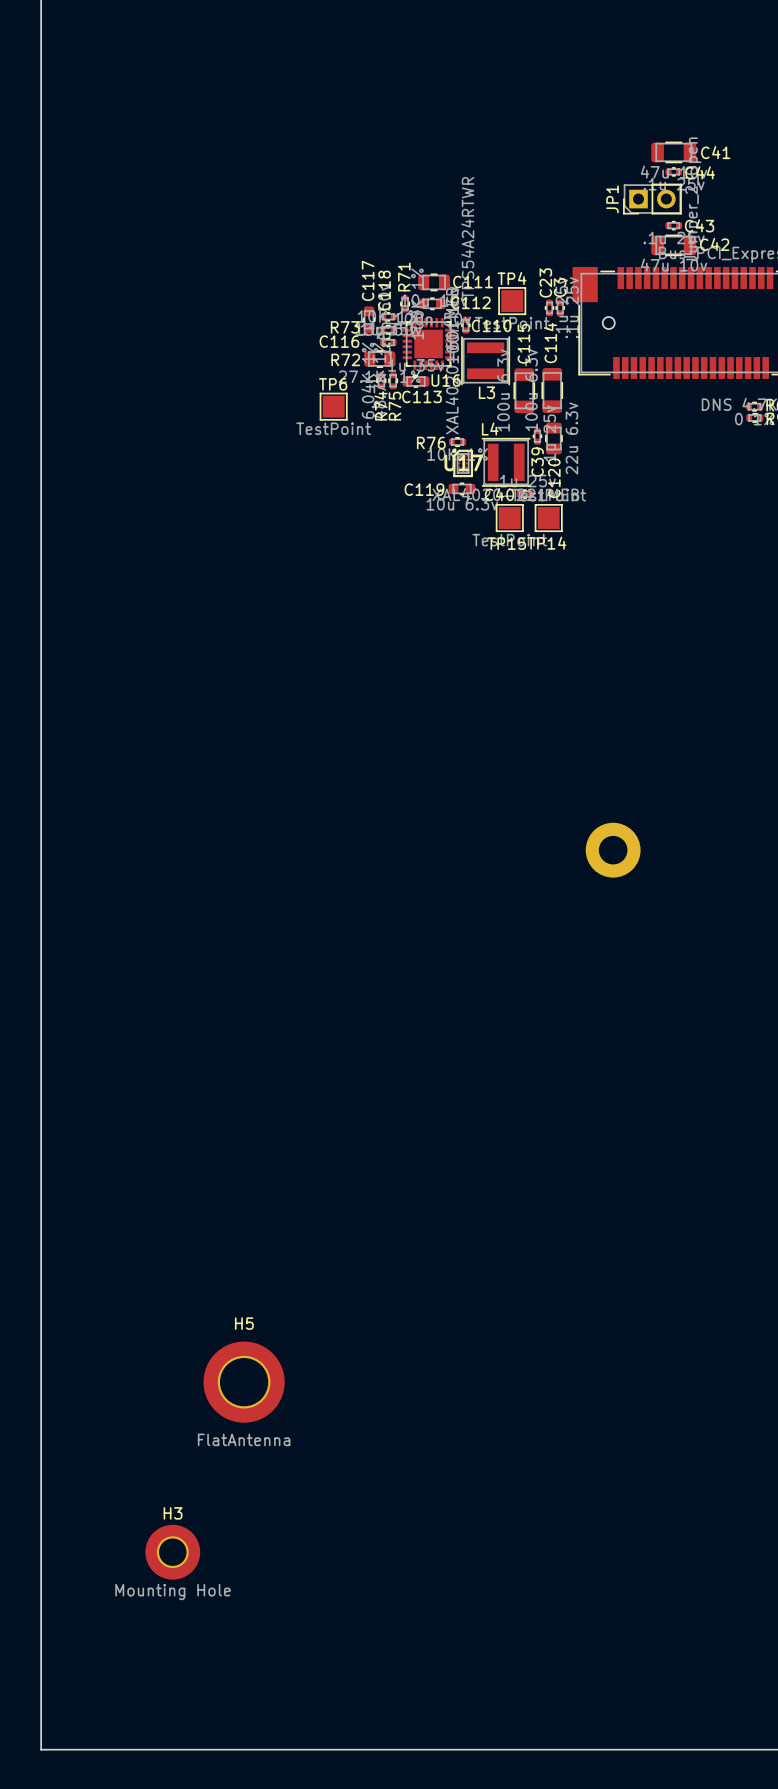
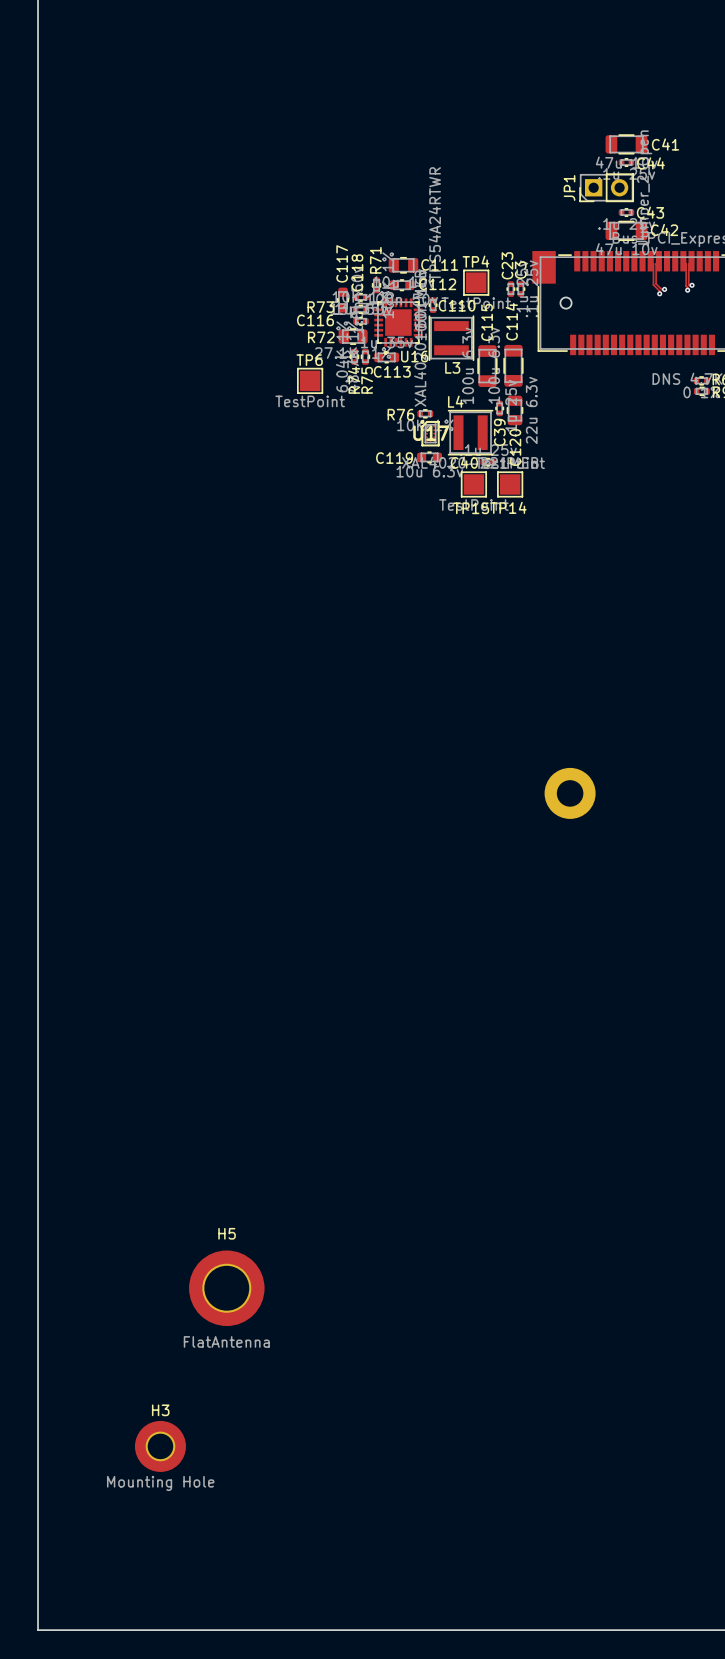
track: none -> (650, 261) (653, 263) (653, 284) (659, 291) (659, 293)
track: none -> (658, 261) (656, 263) (656, 283) (661, 289) (664, 289)
track: none -> (683, 261) (686, 263) (687, 290)
track: none -> (691, 261) (688, 263) (688, 284) (692, 285)
via: none -> (692, 285)
via: none -> (664, 289)
via: none -> (687, 290)
via: none -> (659, 293)

